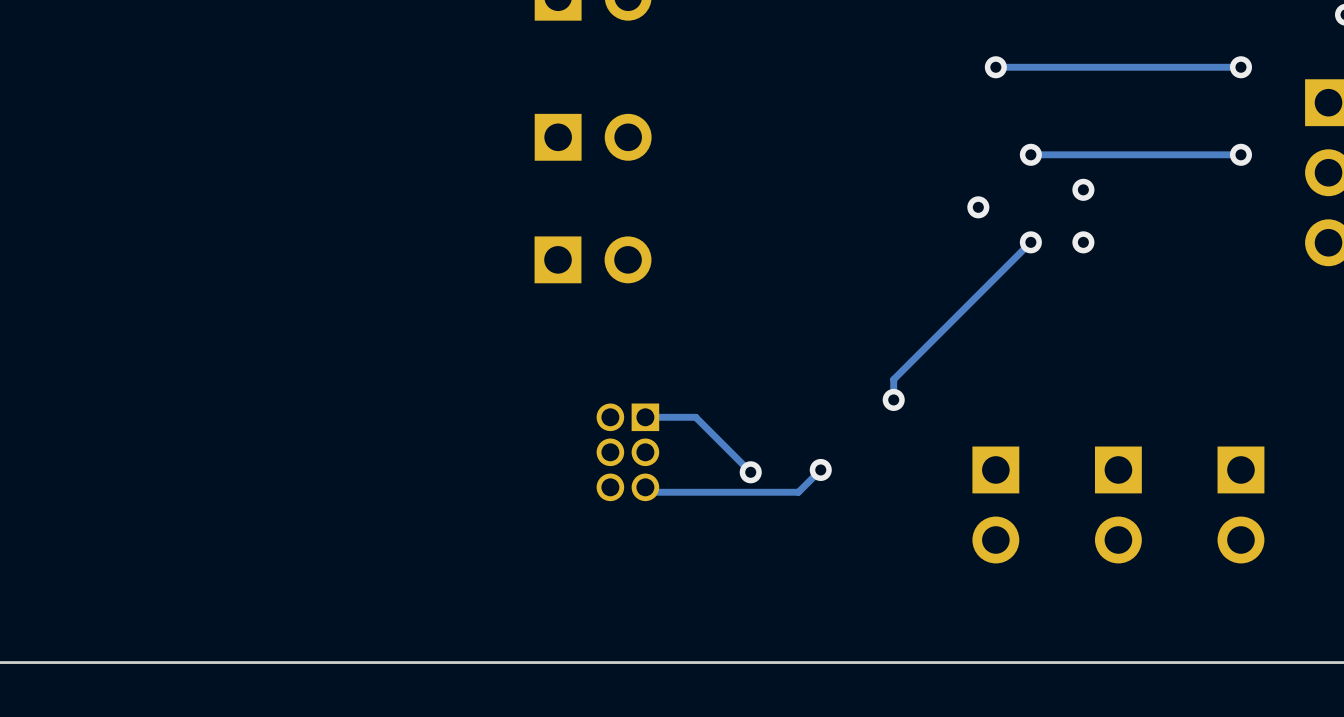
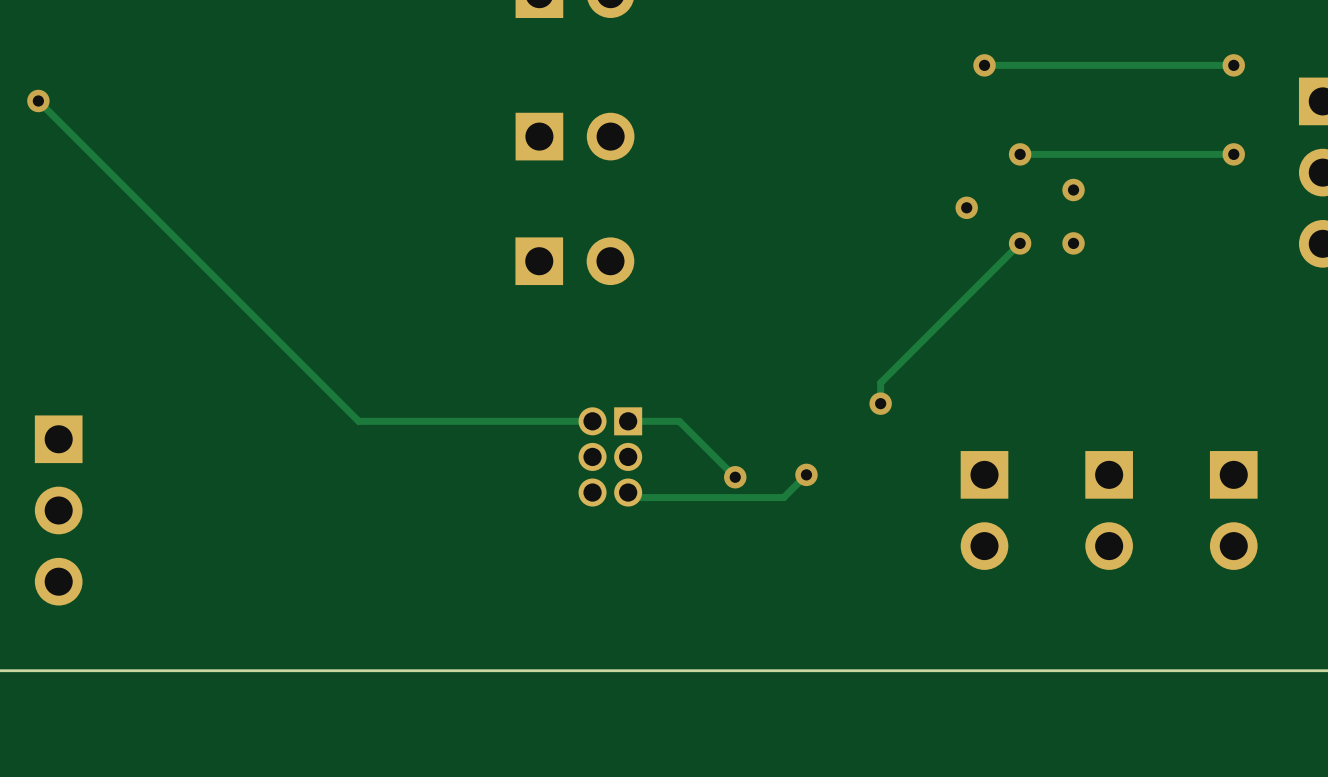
track: none -> (38, 100) (358, 421) (592, 421)
via: none -> (38, 100)
part: none -> (58, 510)

